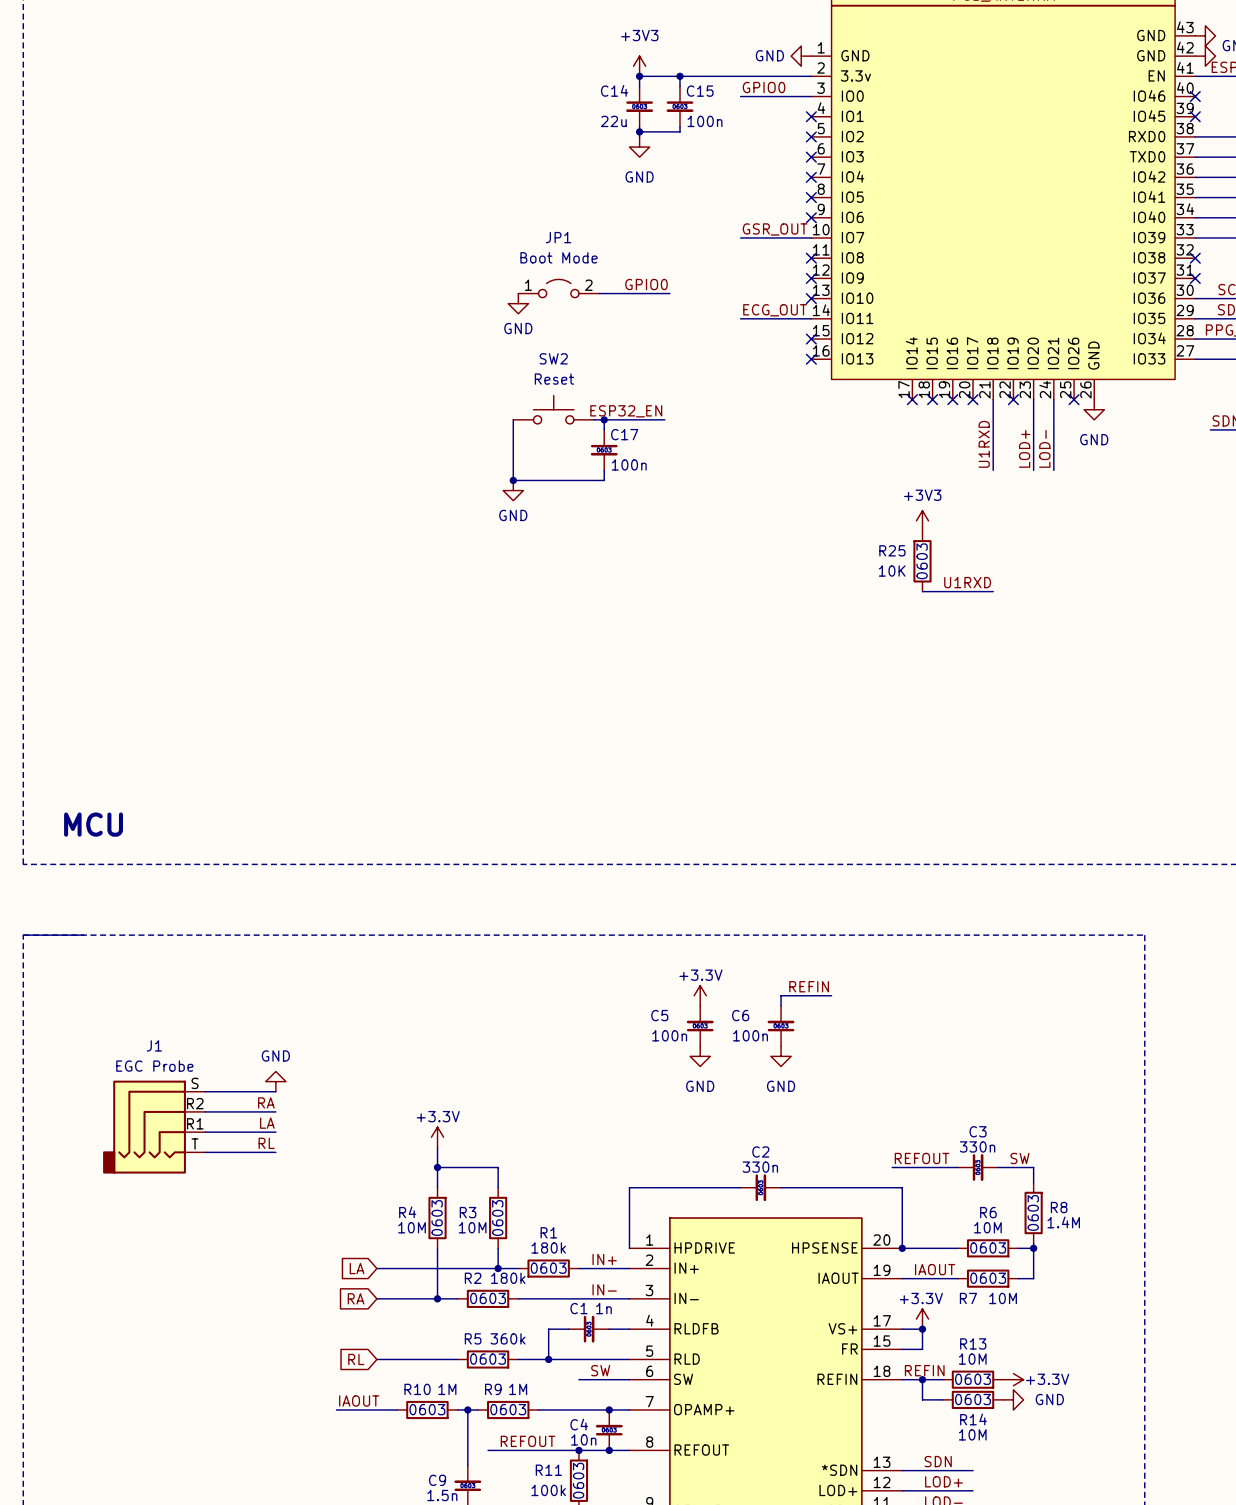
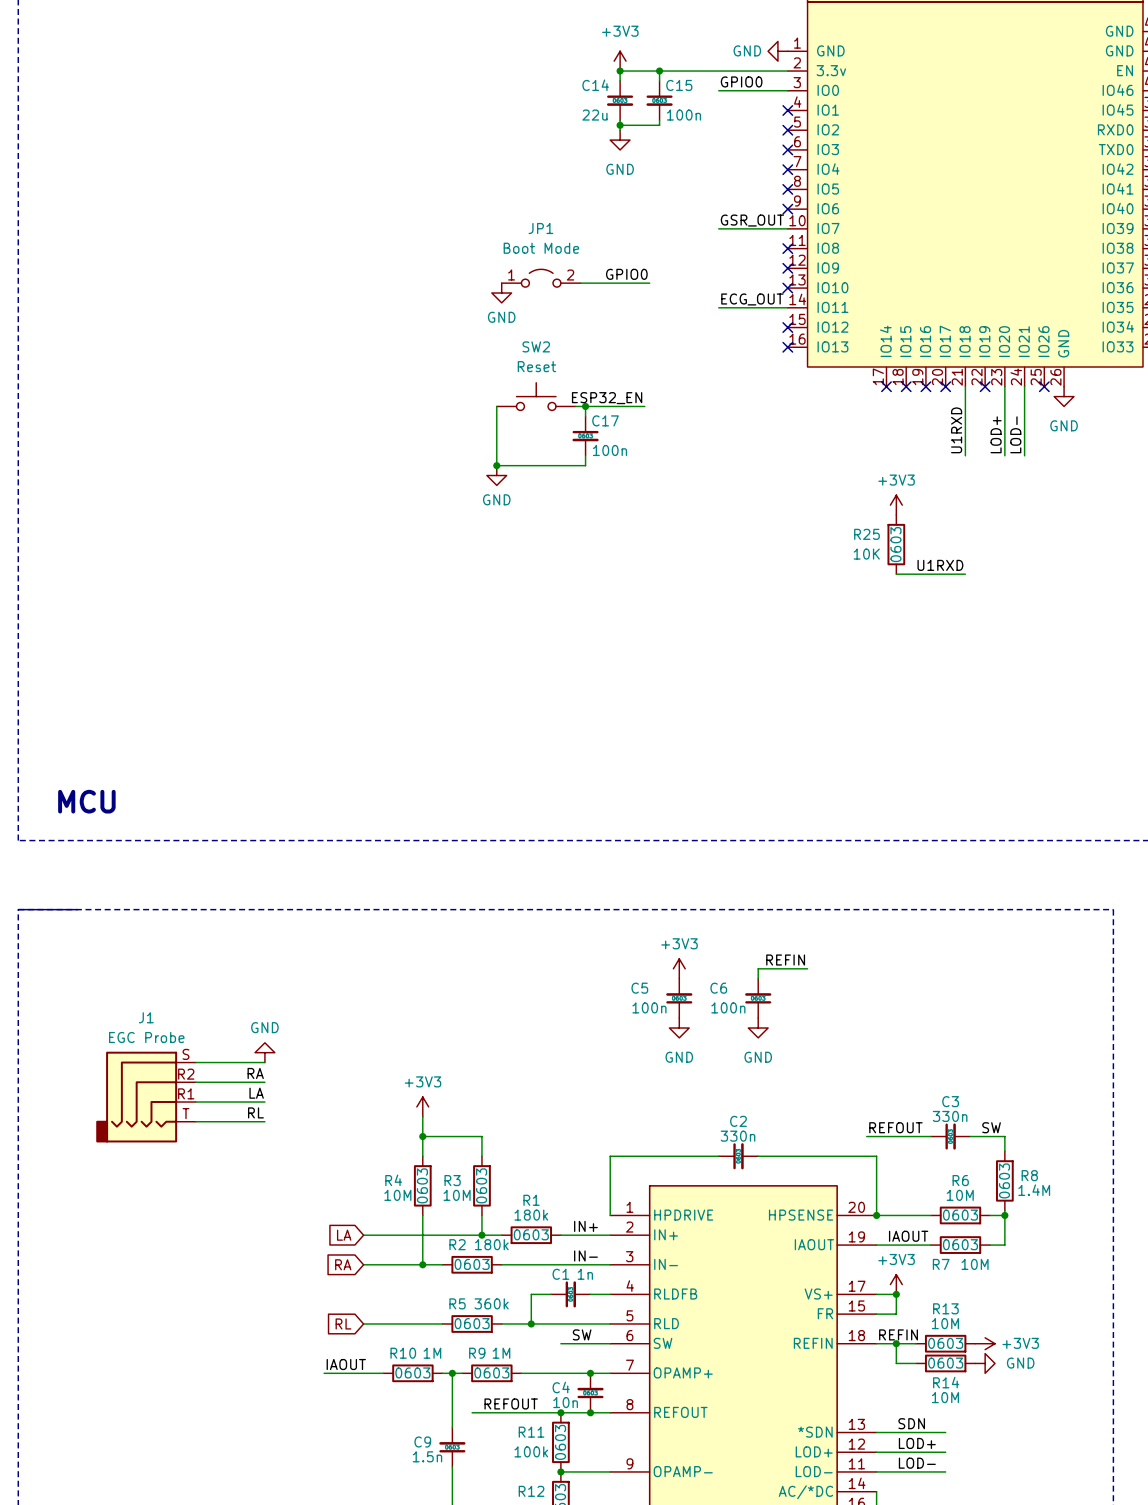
power symbol: +3.3V (700, 995) -> +3V3 (679, 968)
power symbol: +3.3V (437, 1137) -> +3V3 (422, 1106)
power symbol: +3.3V (922, 1319) -> +3V3 (896, 1284)
power symbol: +3.3V (1013, 1379) -> +3V3 (985, 1343)

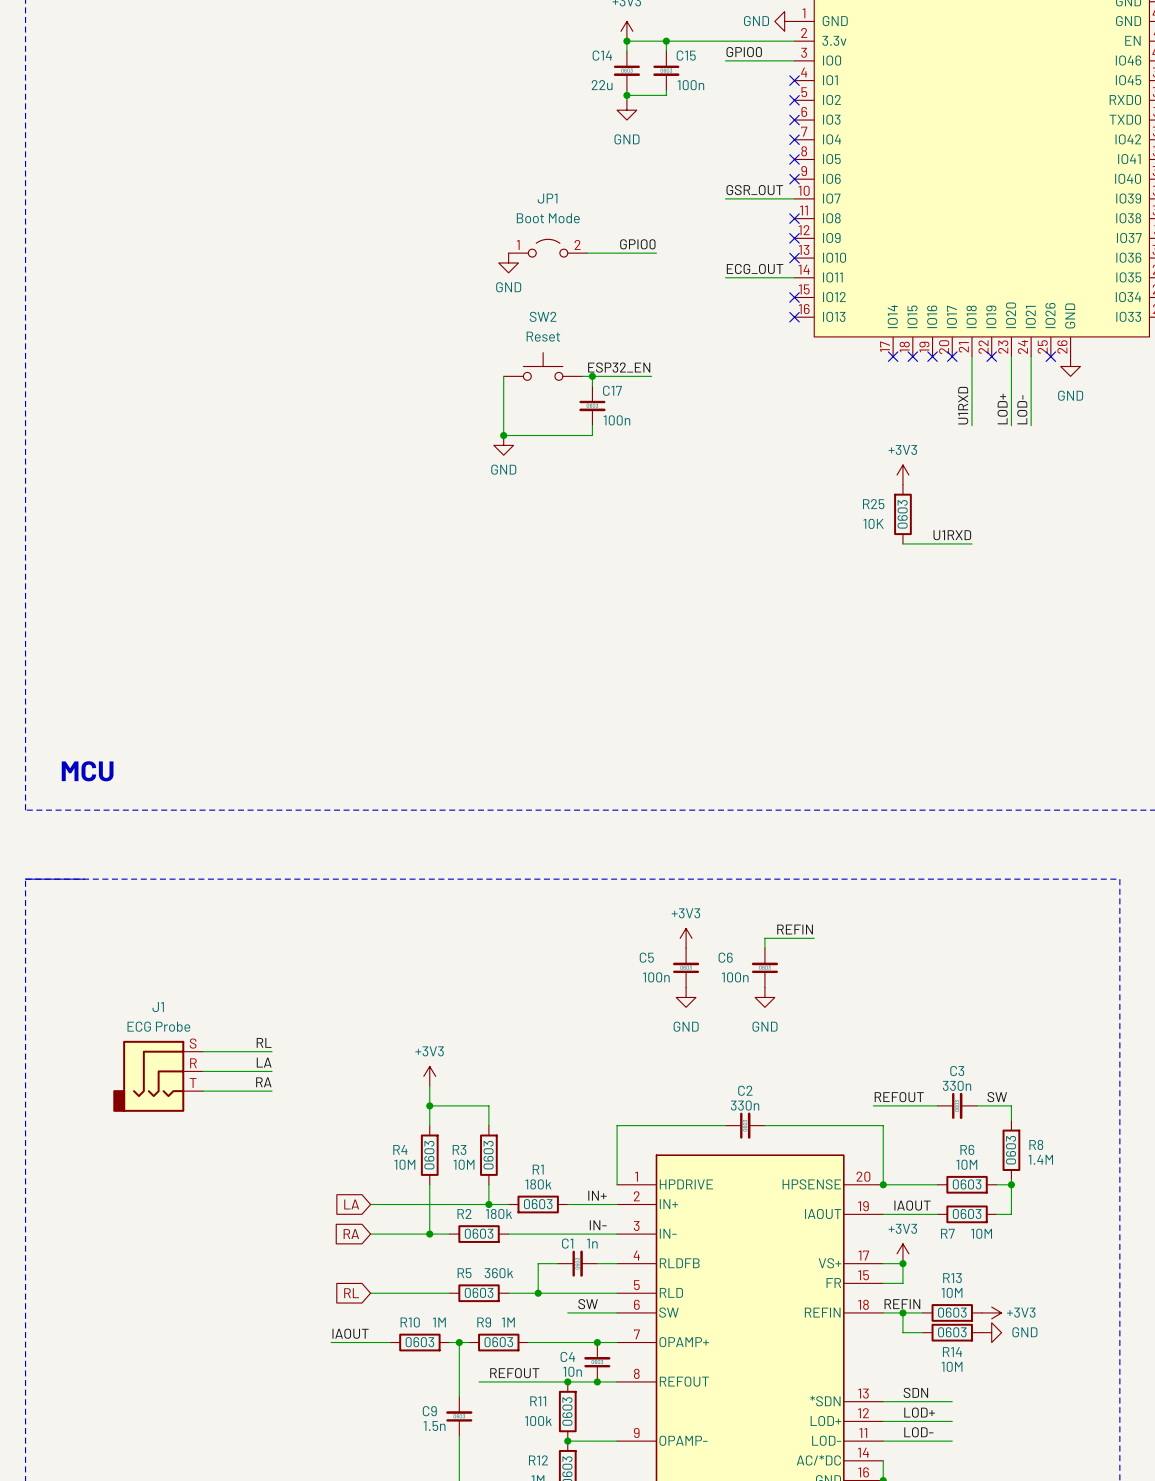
J1 value: EGC Probe (146, 1037) -> ECG Probe (158, 1026)
J1 symbol: [96, 1051, 196, 1143] -> [113, 1040, 203, 1112]
power symbol: GND (264, 1052) -> none
wire: (195, 1062) (264, 1062) -> none
label: RA (255, 1073) -> RL (264, 1042)
label: RL (255, 1112) -> RA (263, 1082)

